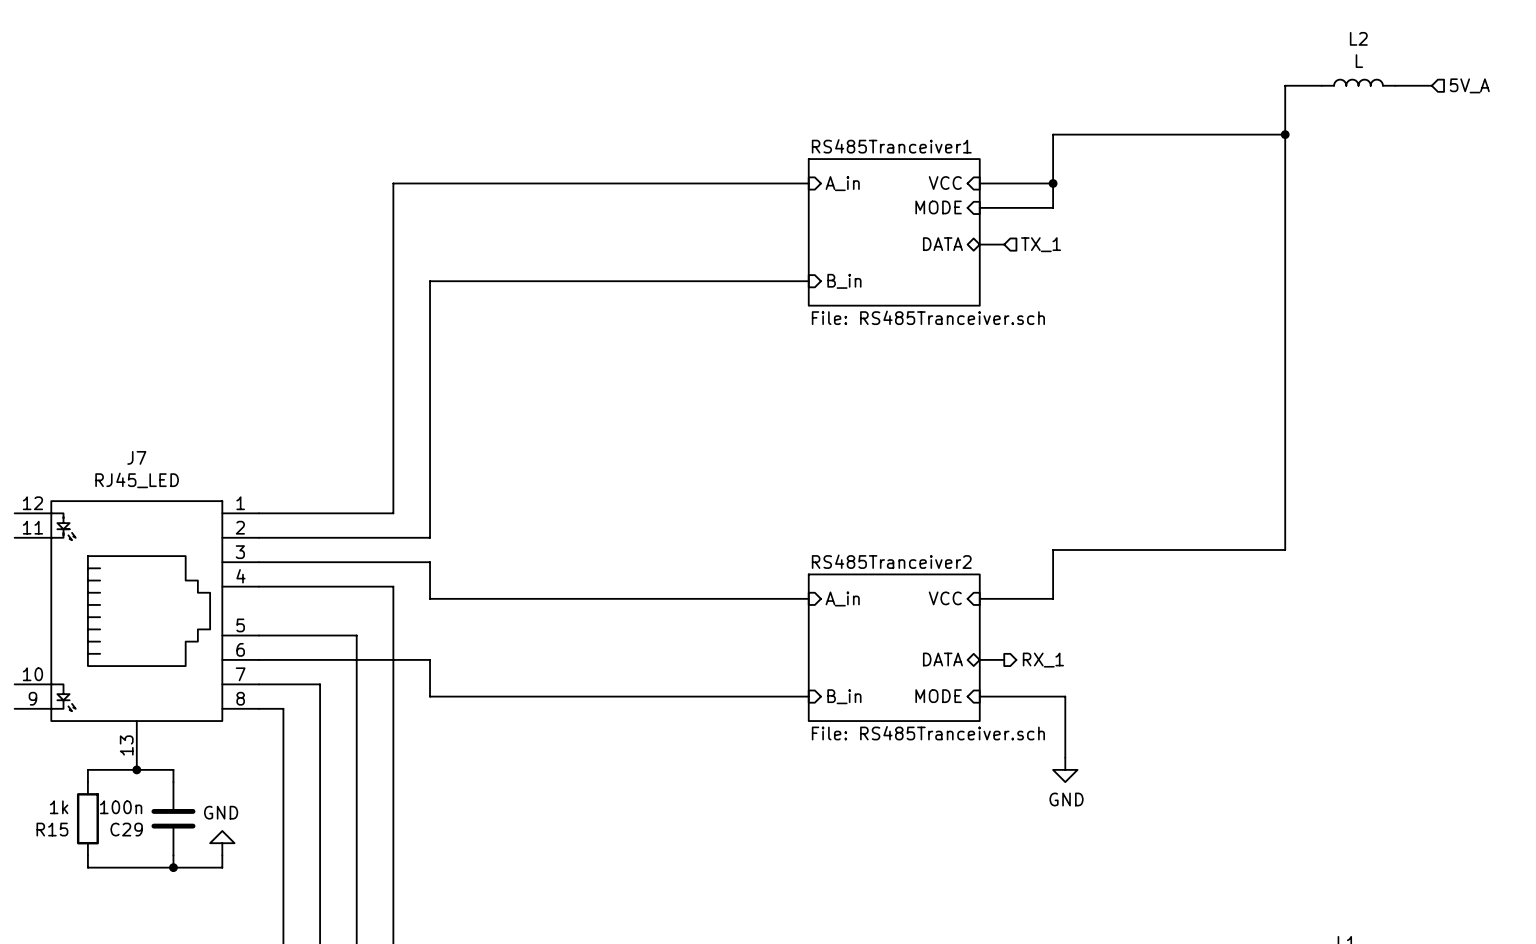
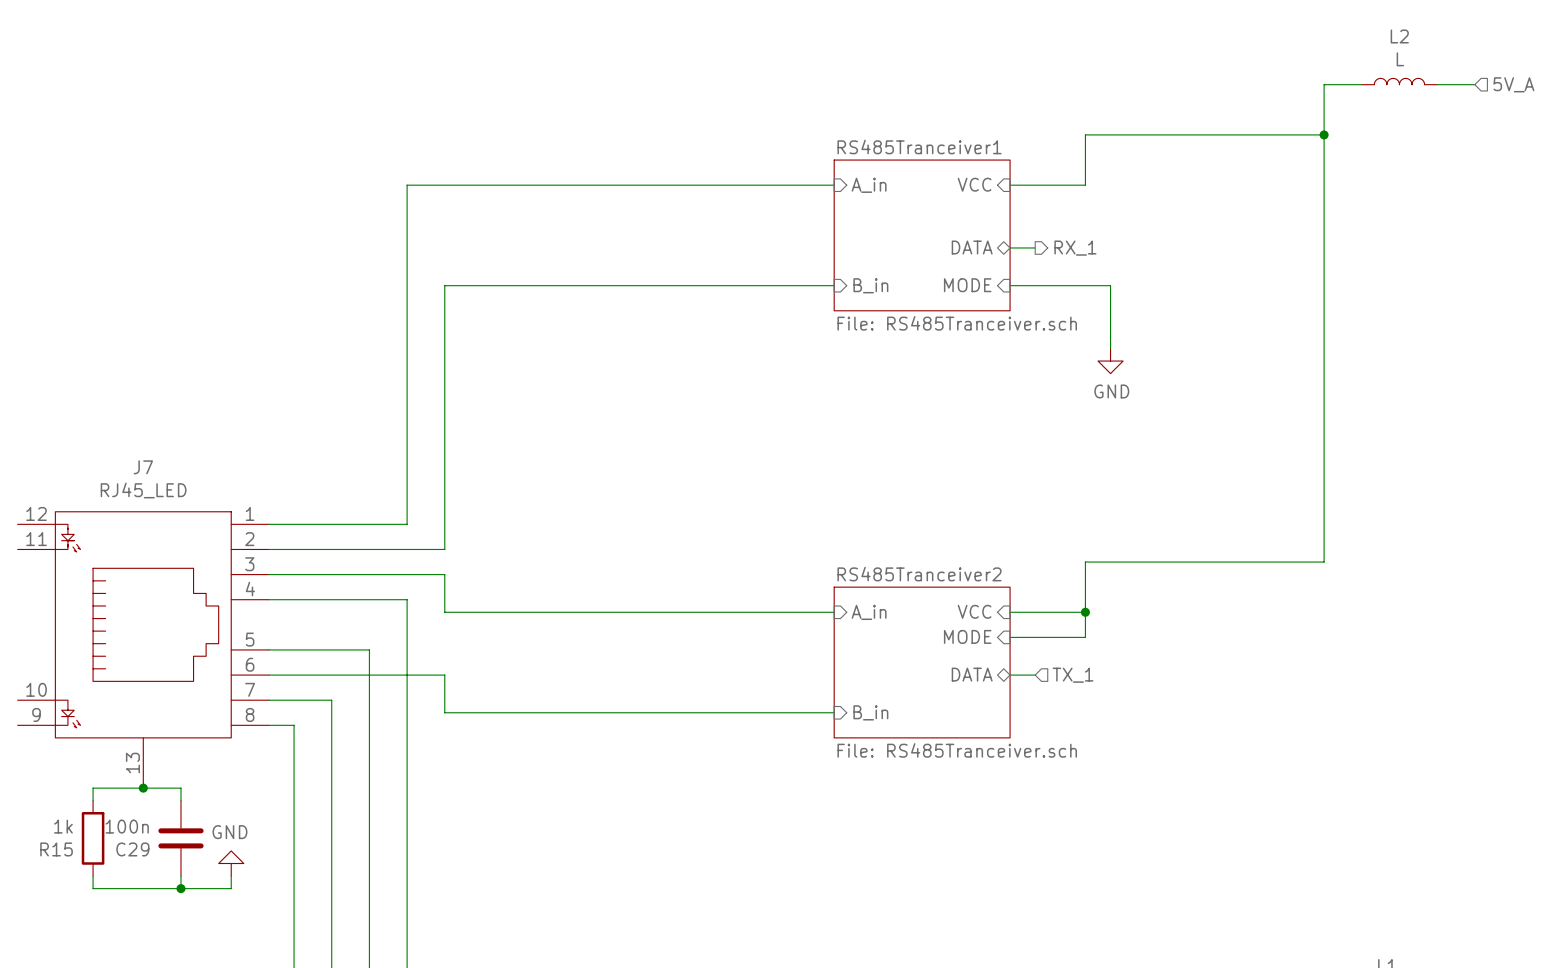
wire: (1053, 183) (1053, 207) (979, 207) -> none
junction: (1053, 183) -> none
sheet pin position: MODE (938, 207) -> MODE (967, 285)
hierarchical label shape: input (1041, 244) -> output (1075, 248)
hierarchical label: TX_1 (1041, 244) -> RX_1 (1075, 248)
wire: none -> (1010, 285) (1110, 285) (1110, 348)
power symbol: none -> GND (1110, 361)
wire: none -> (1085, 612) (1085, 637) (1010, 637)
junction: none -> (1085, 612)
hierarchical label shape: output (1043, 660) -> input (1073, 675)
hierarchical label: RX_1 (1043, 660) -> TX_1 (1073, 675)
sheet pin position: MODE (938, 696) -> MODE (967, 636)
wire: (979, 696) (1065, 696) (1065, 757) -> none
power symbol: GND (1065, 769) -> none

